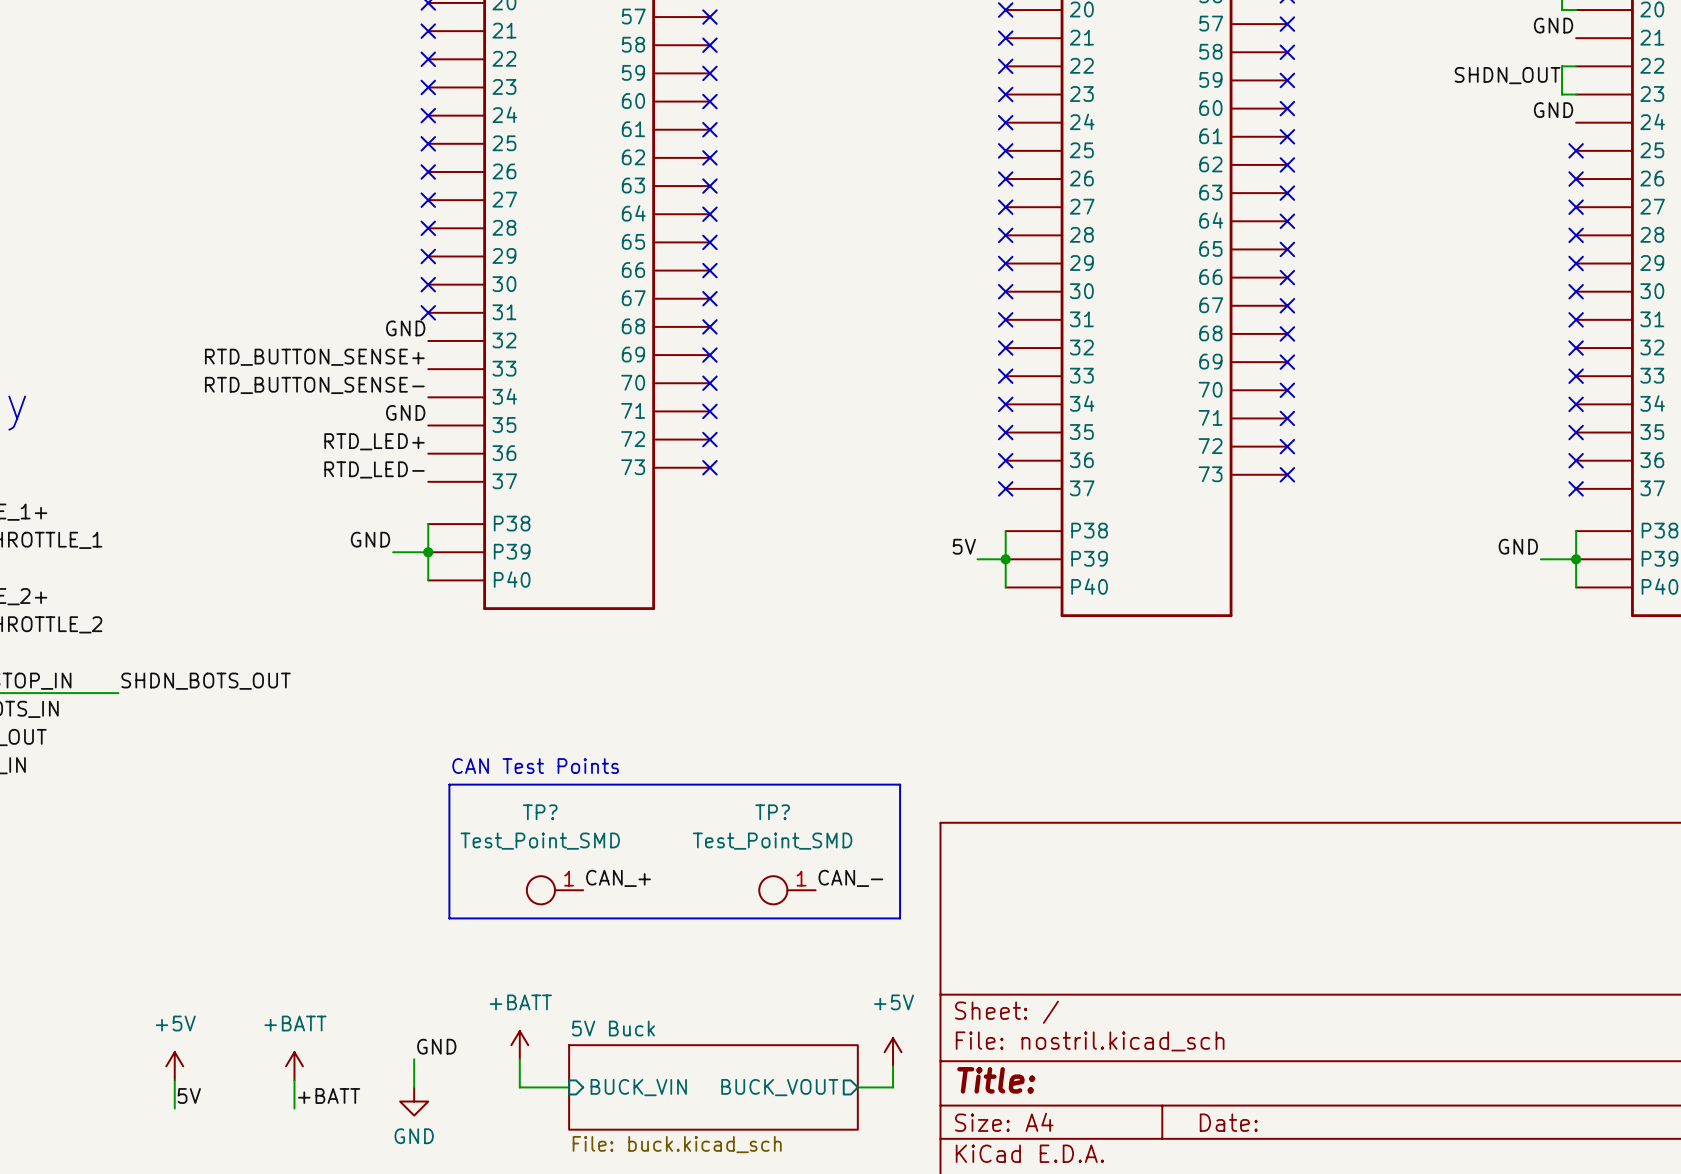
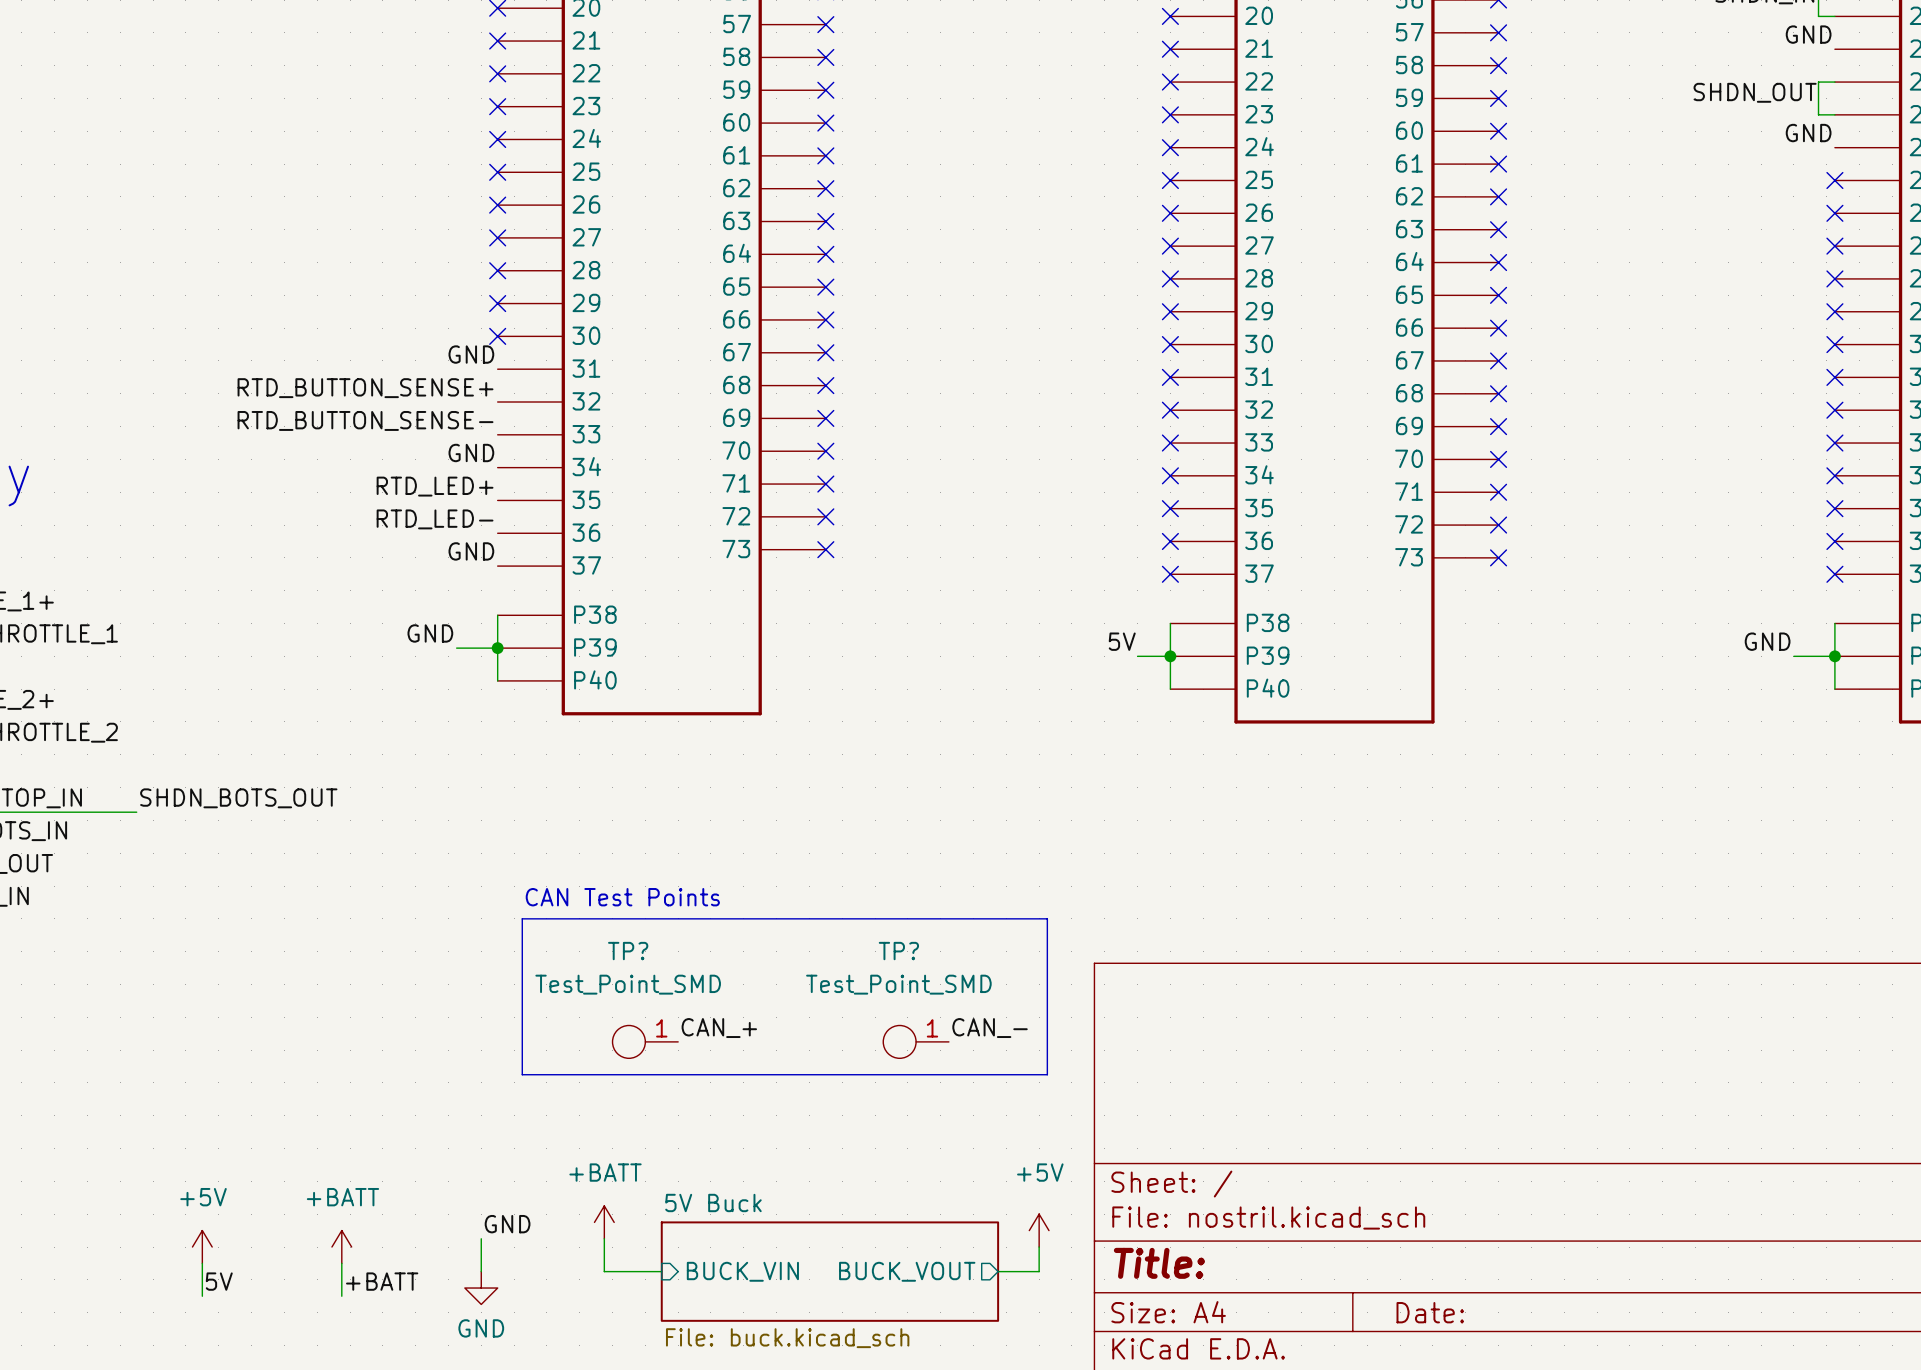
label: none -> GND (471, 354)
no-connect mark: (428, 312) -> none
label: GND (405, 328) -> RTD_BUTTON_SENSE+ (365, 388)
label: RTD_BUTTON_SENSE+ (314, 357) -> RTD_BUTTON_SENSE- (365, 420)
label: RTD_BUTTON_SENSE- (314, 385) -> GND (471, 452)
label: GND (405, 412) -> RTD_LED+ (435, 486)
label: RTD_LED+ (374, 441) -> RTD_LED- (435, 519)
label: RTD_LED- (374, 469) -> GND (471, 551)

